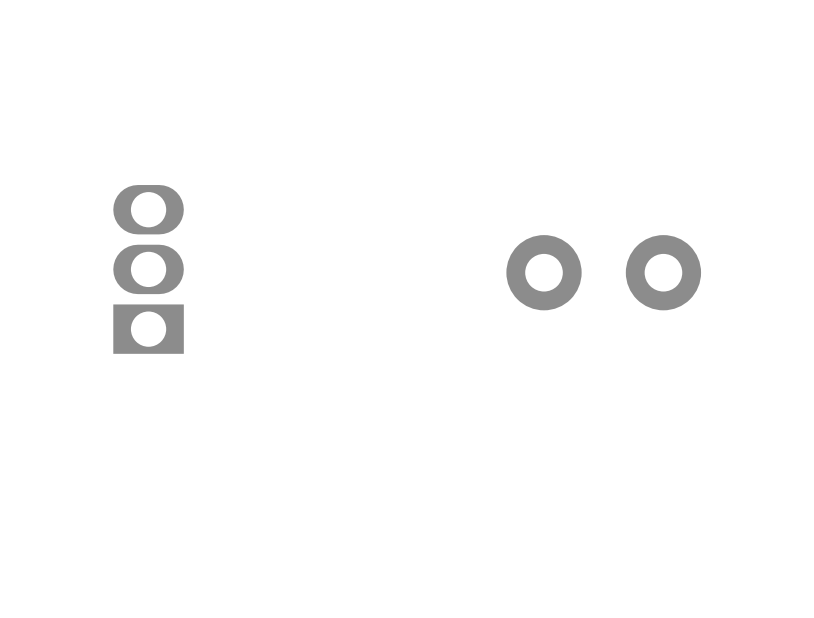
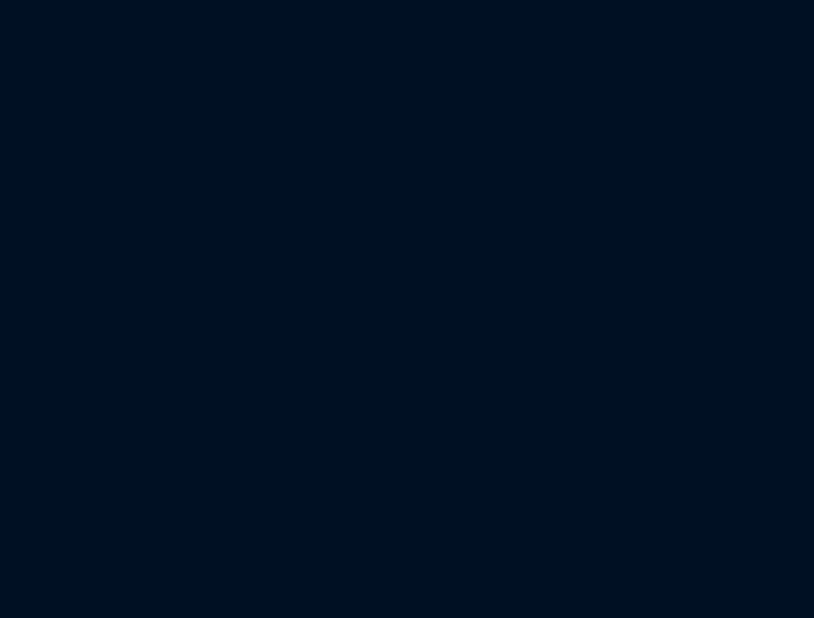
part: (148, 269) -> none
part: (603, 272) -> none

